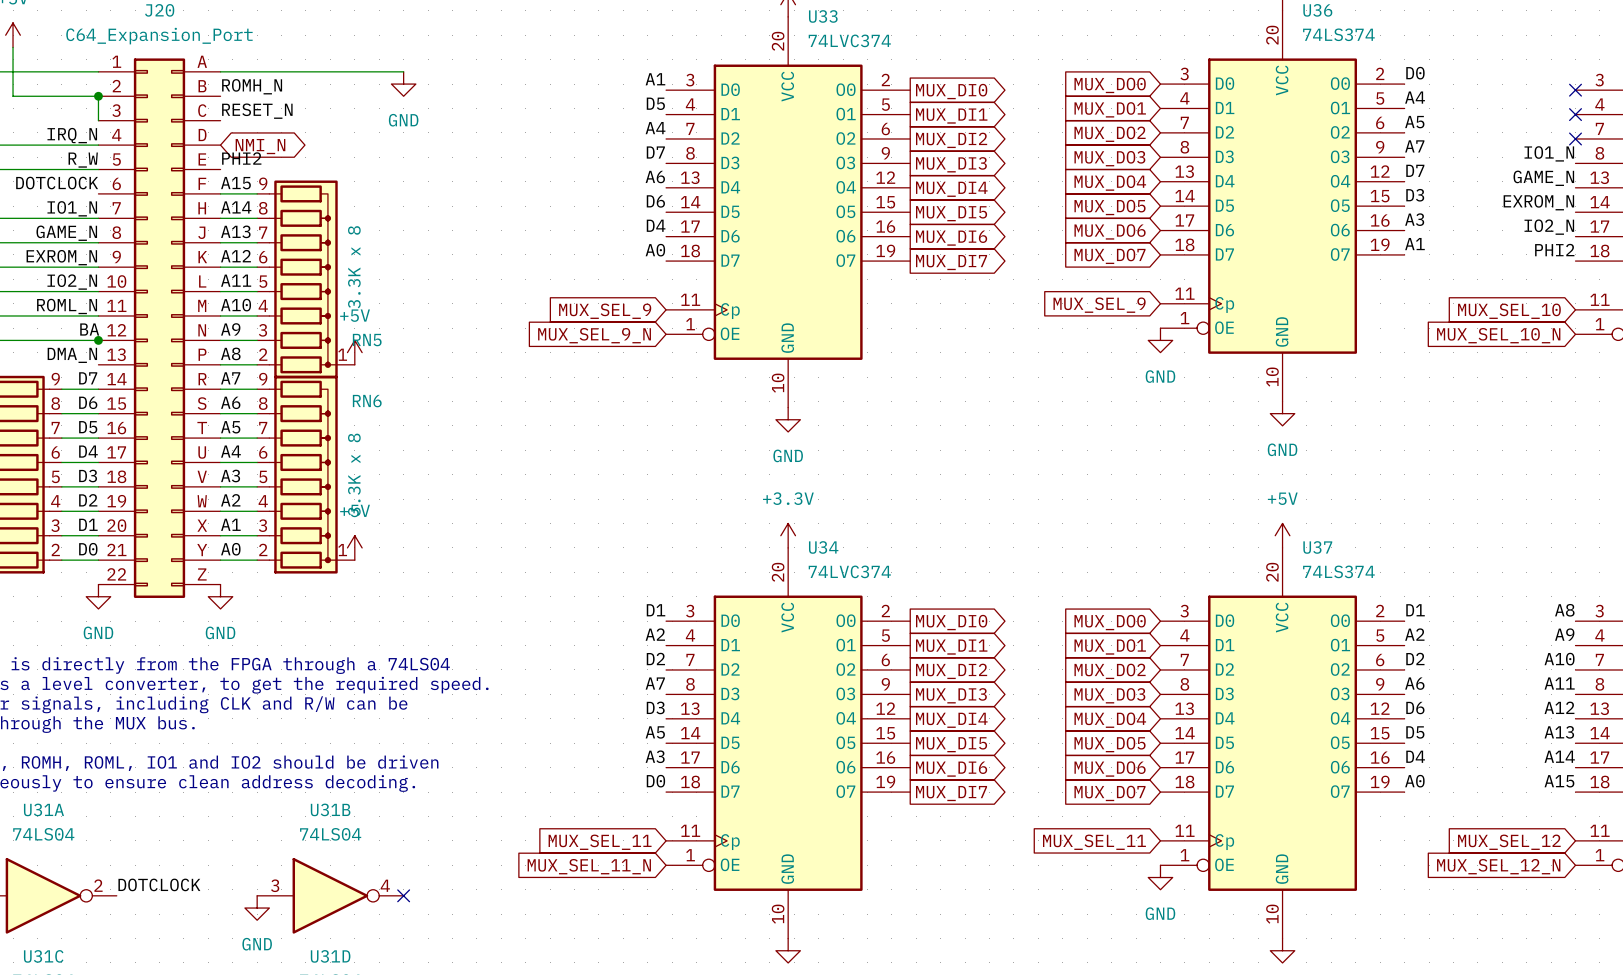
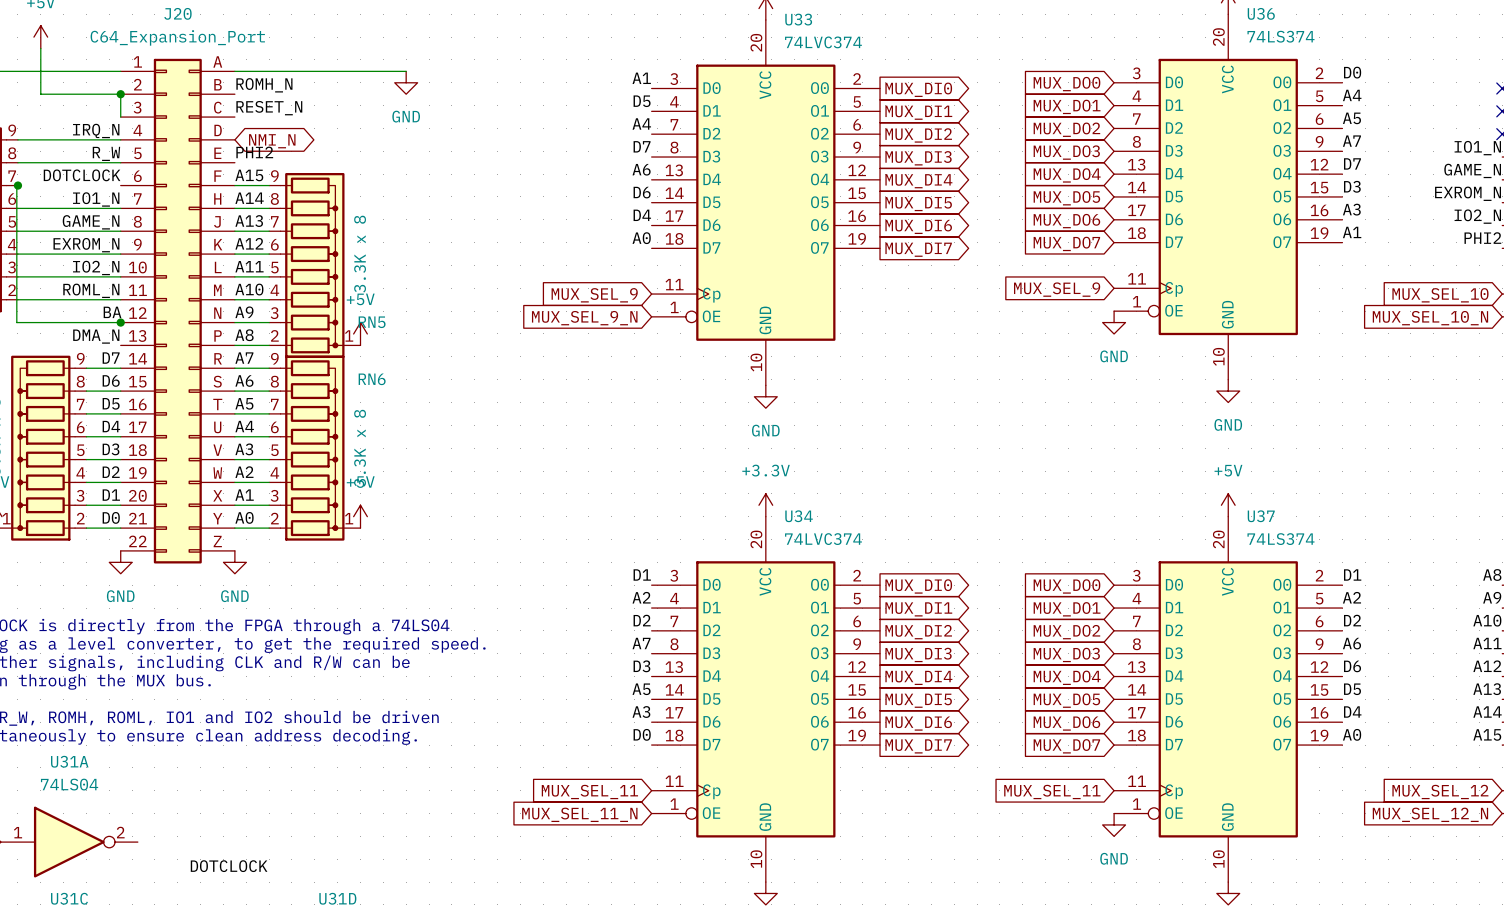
label position: DOTCLOCK (159, 884) -> DOTCLOCK (229, 866)
U31B: 74LS04 (330, 895) -> none
no-connect mark: (403, 895) -> none
power symbol: GND (257, 908) -> none

